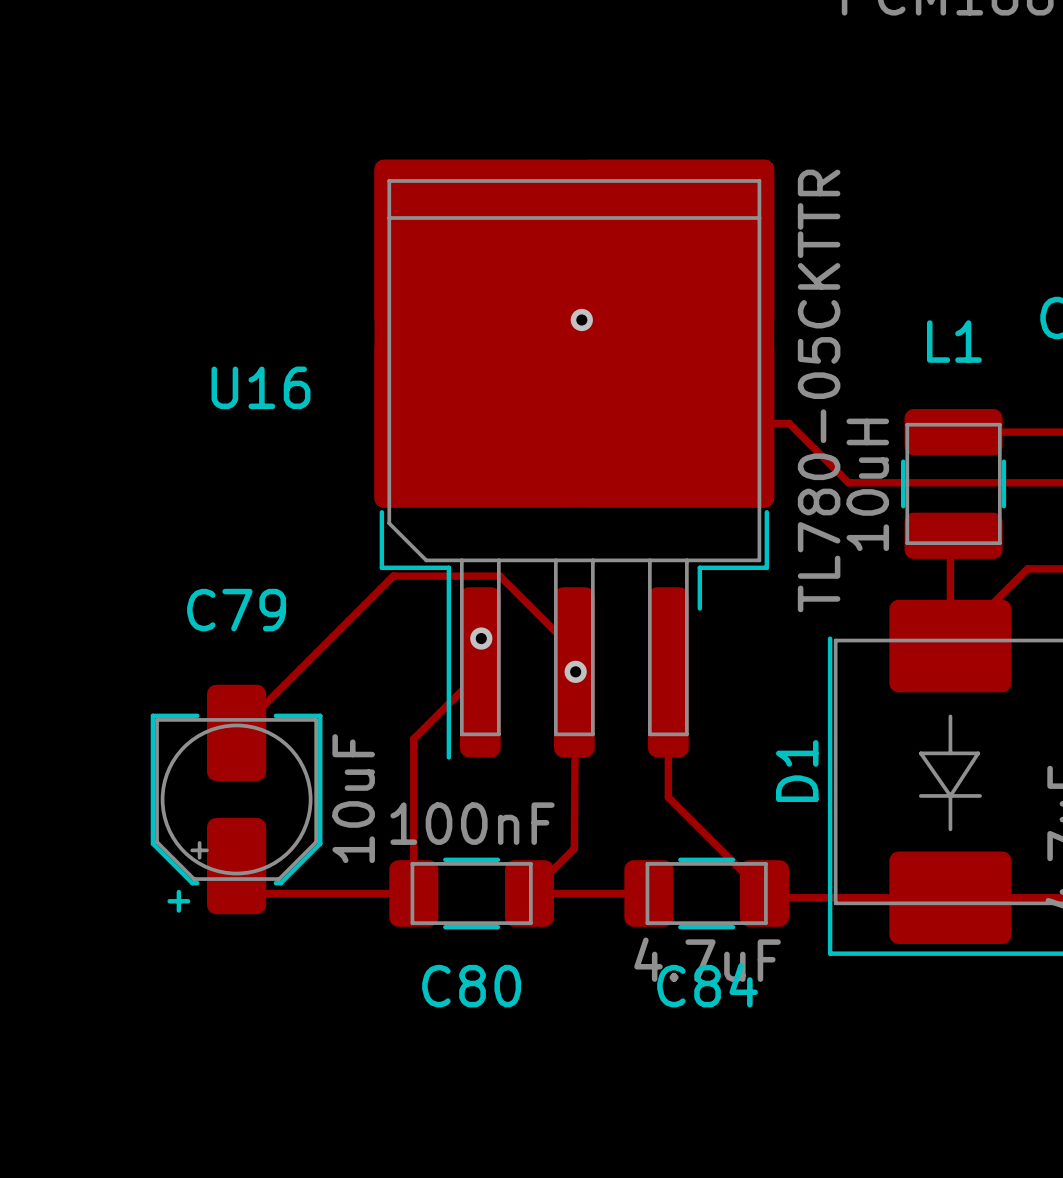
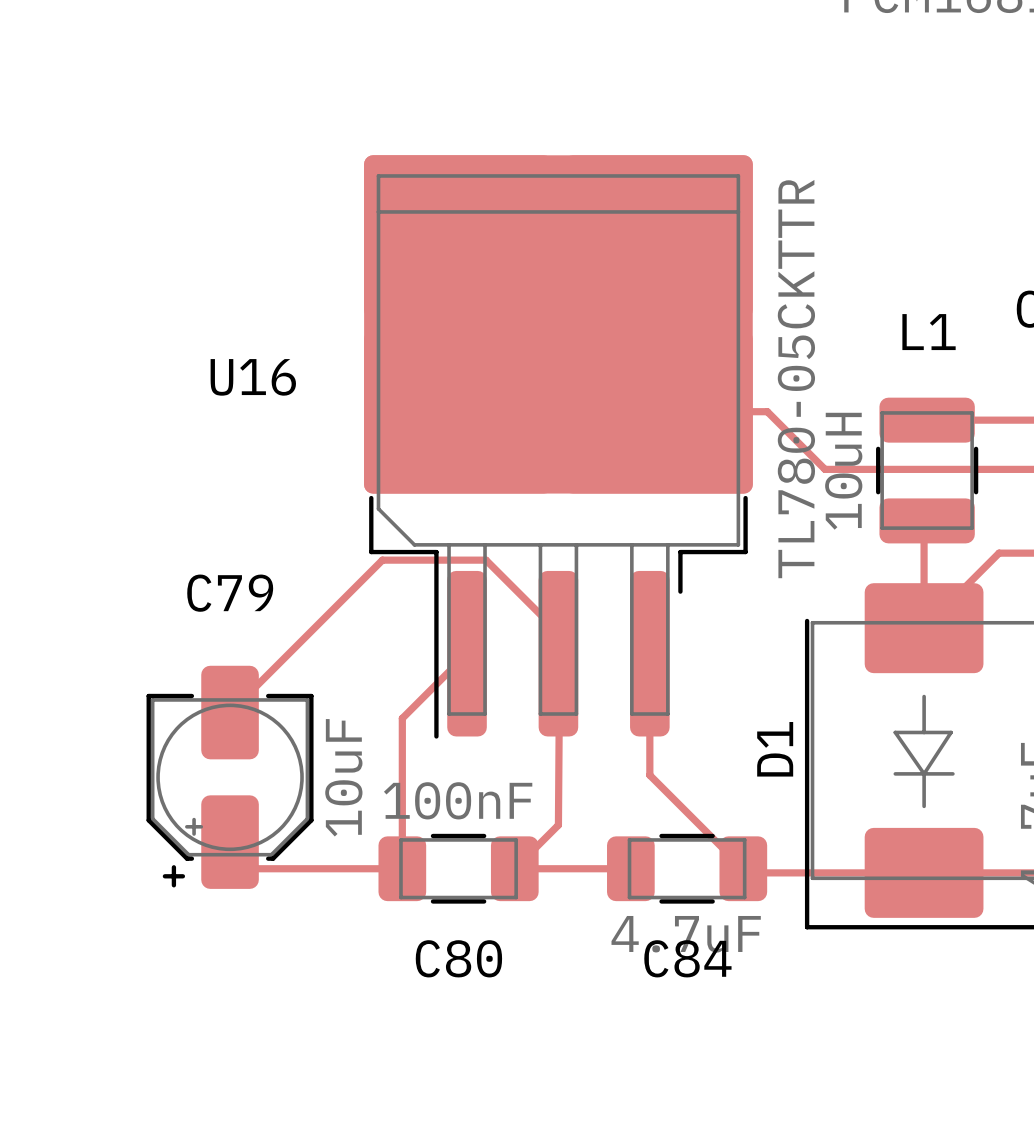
via: (581, 319) -> none
via: (481, 638) -> none
via: (575, 671) -> none

